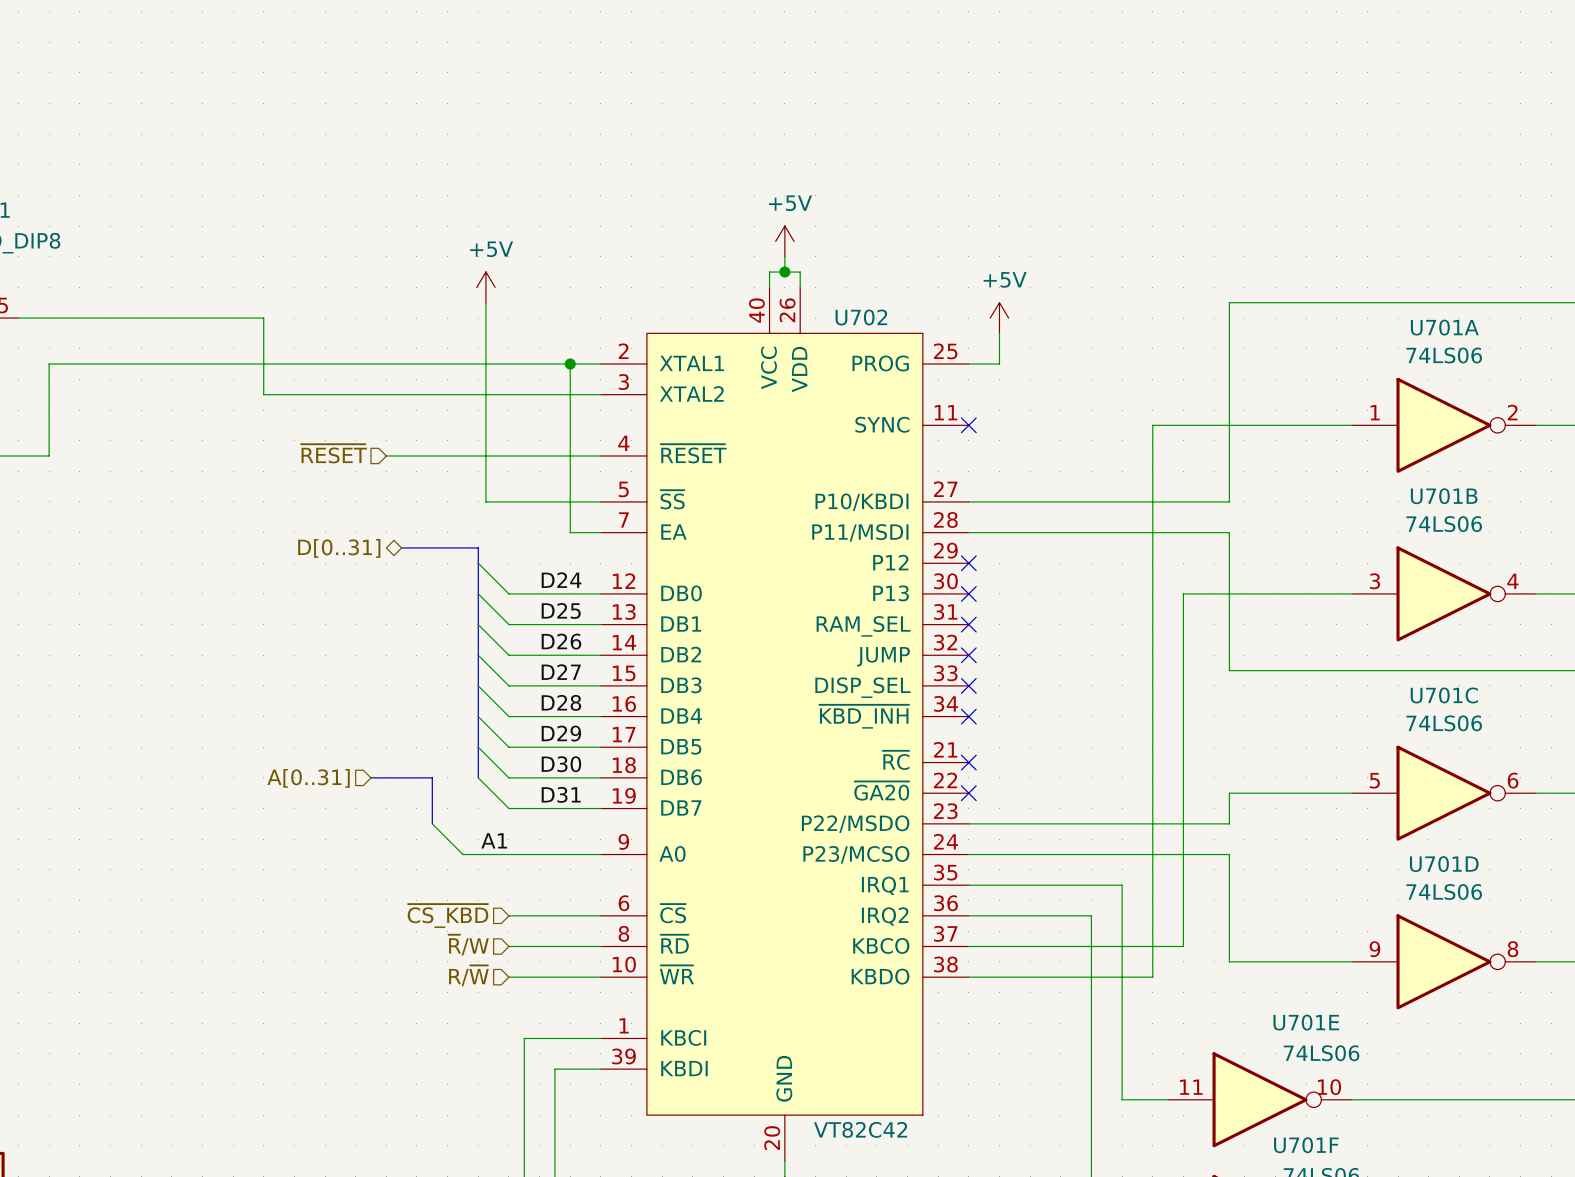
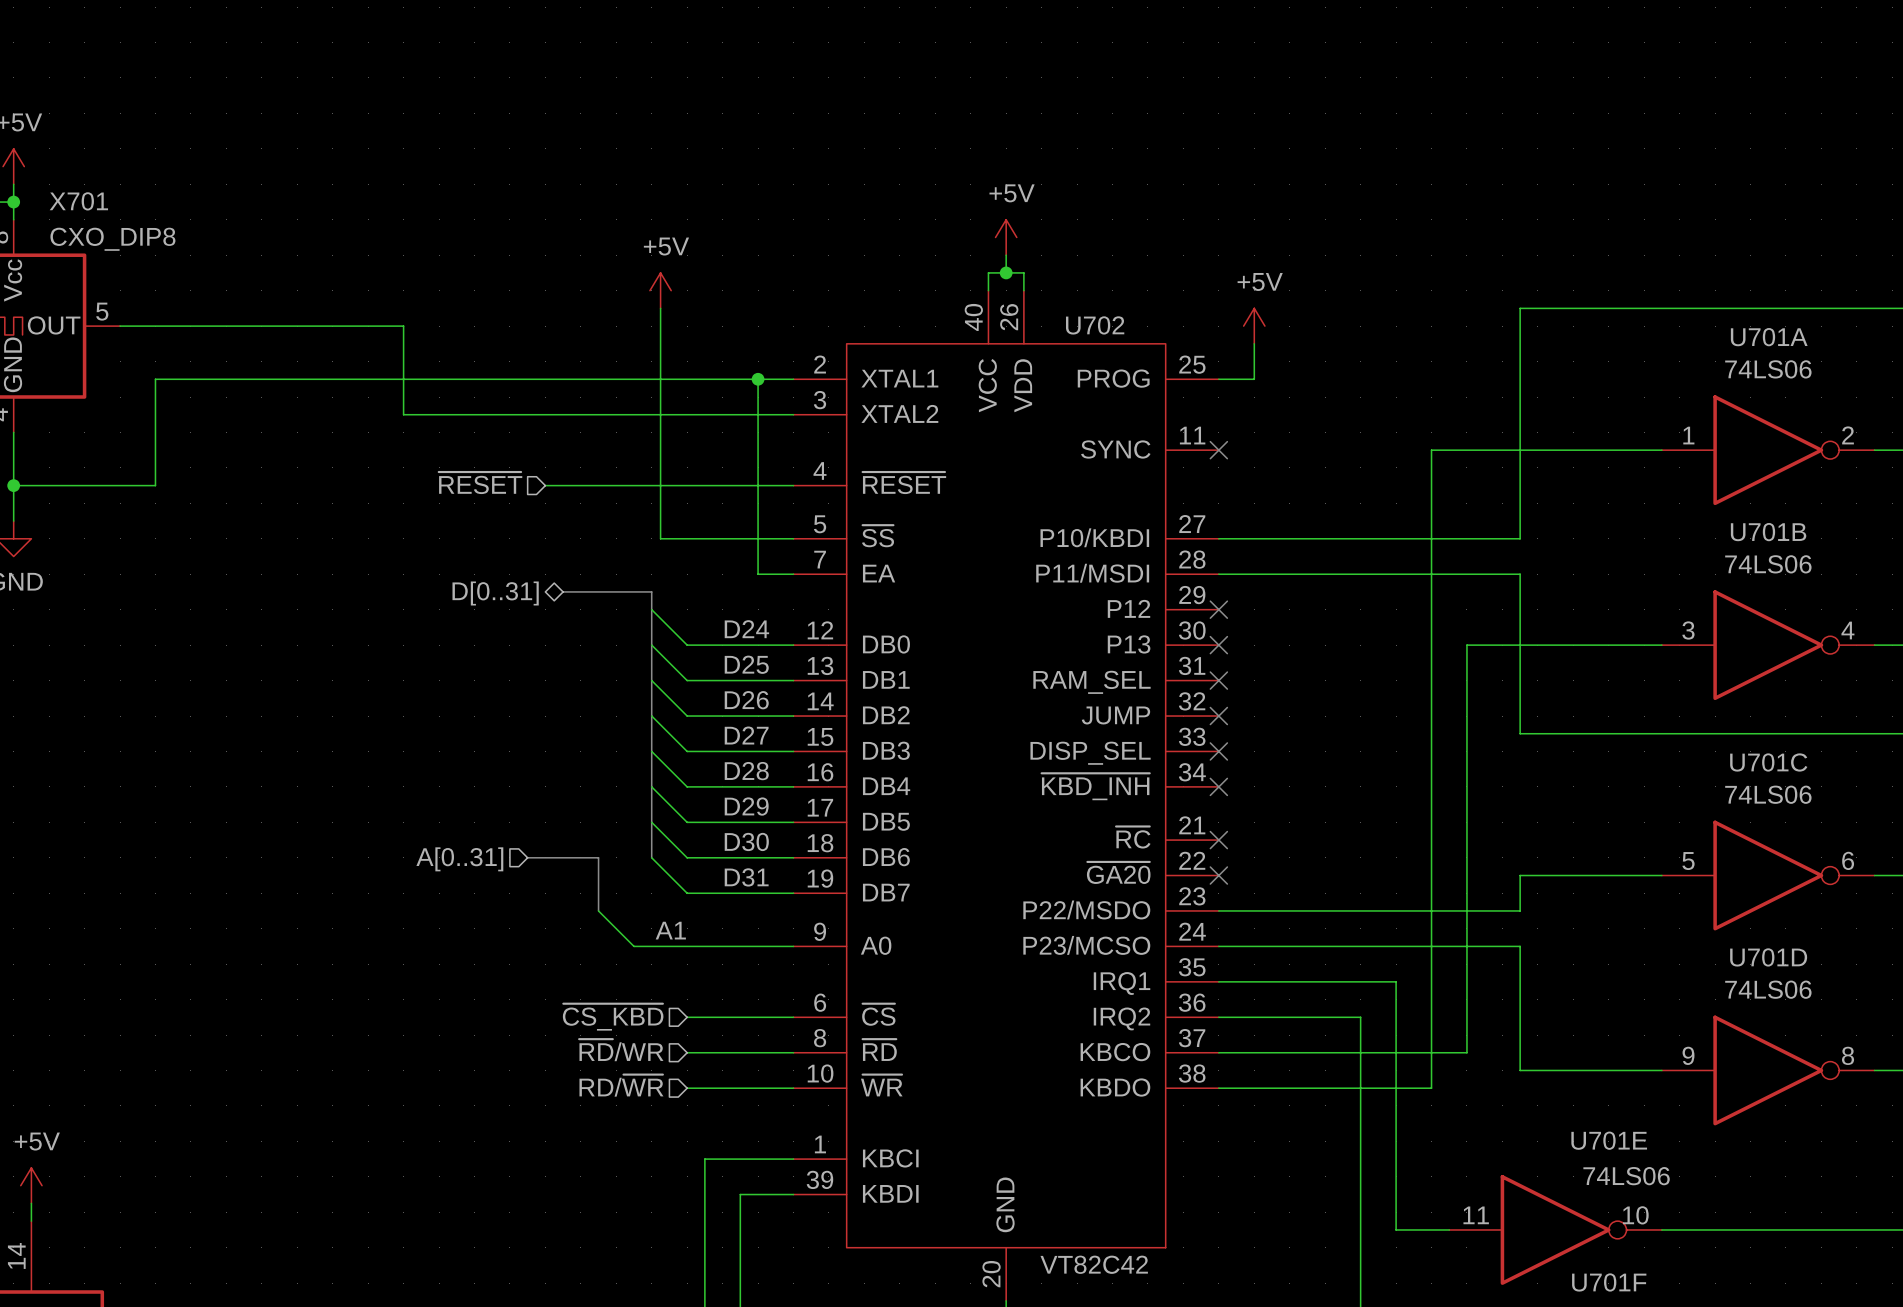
hierarchical label: ~{R}/W (468, 945) -> ~{RD}/WR (621, 1050)
hierarchical label: R/~{W} (468, 975) -> RD/~{WR} (621, 1085)

